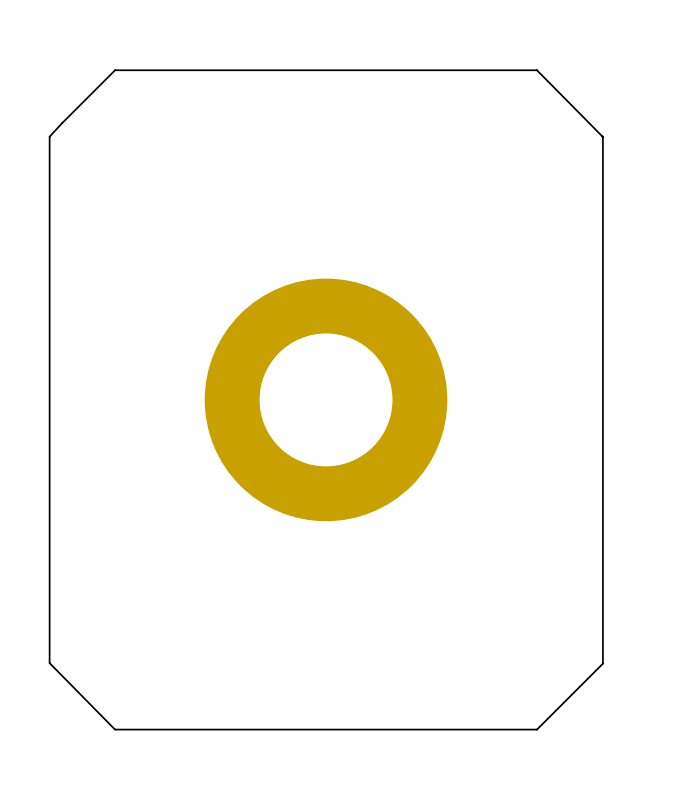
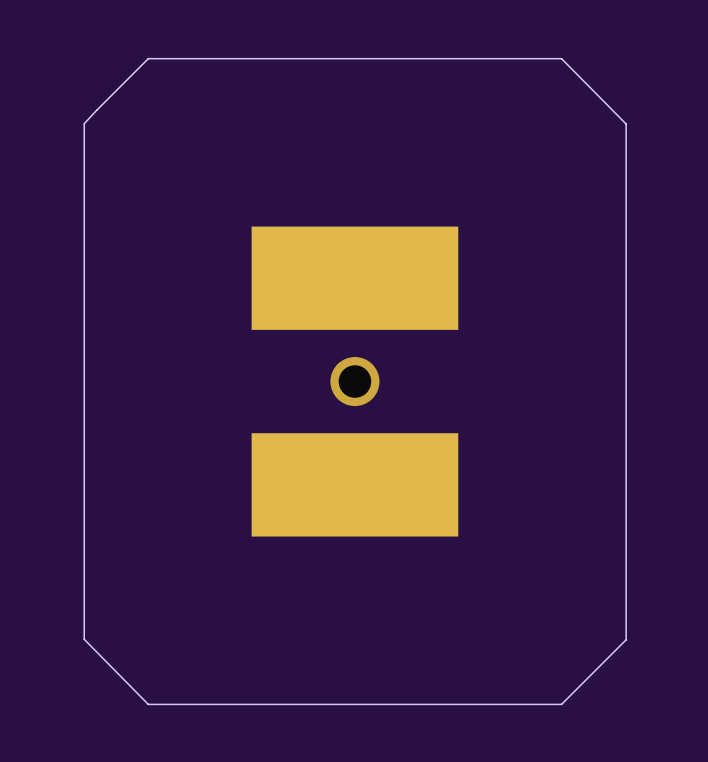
part: none -> (354, 278)
part: (326, 399) -> none
via: none -> (354, 381)
part: none -> (354, 484)

